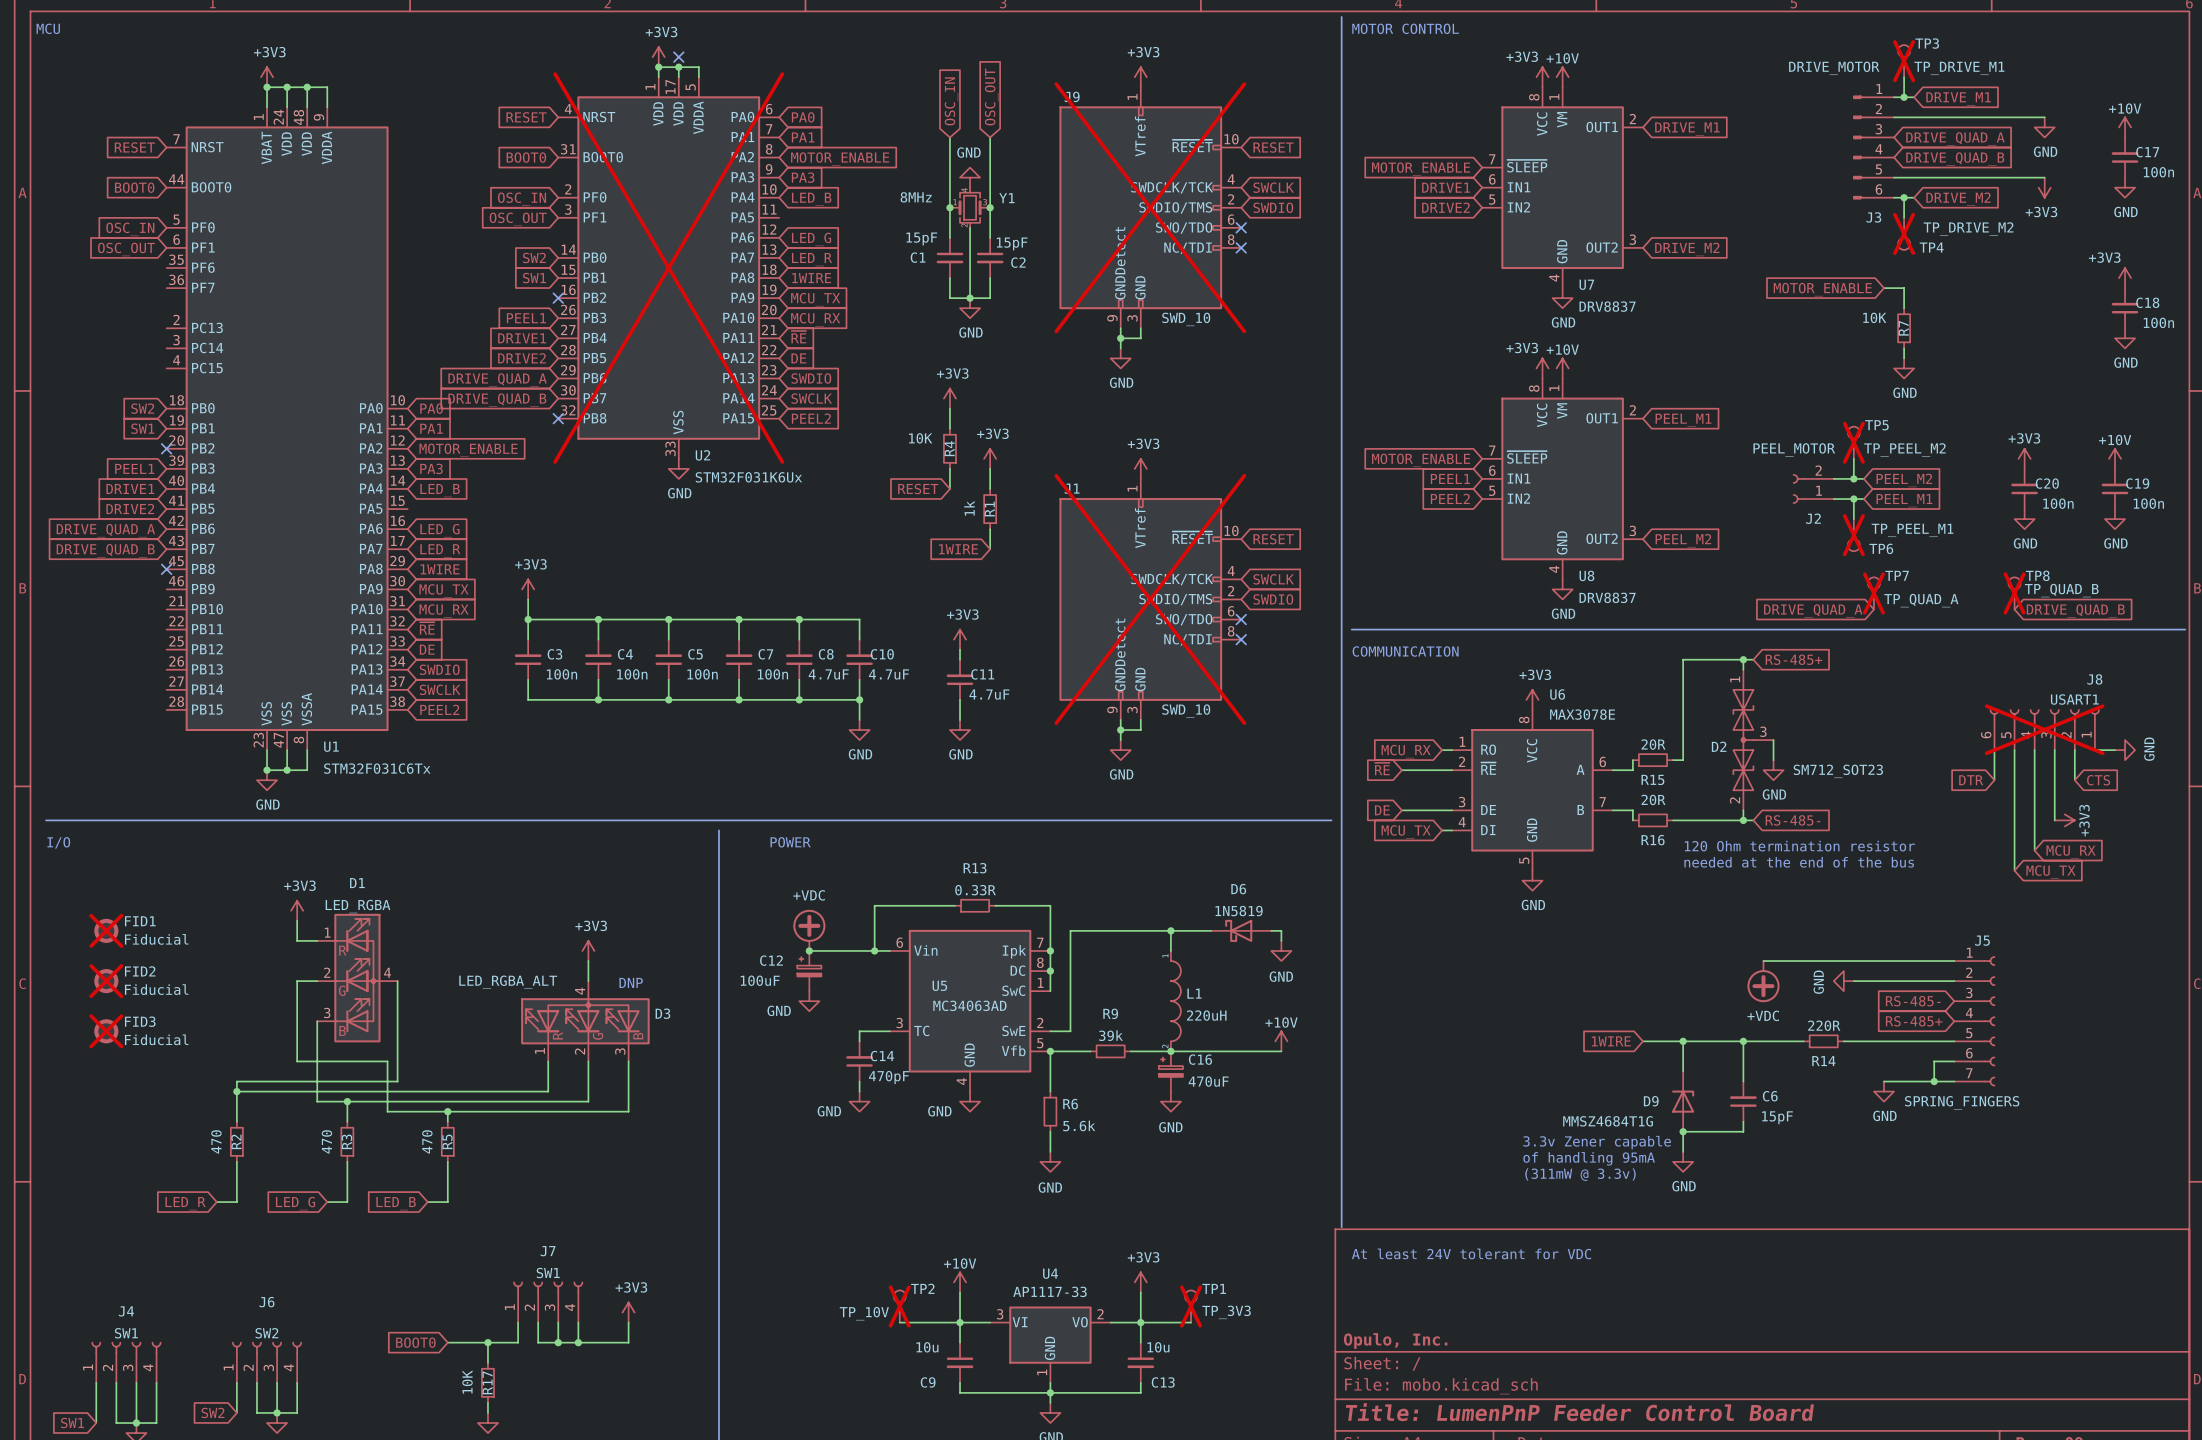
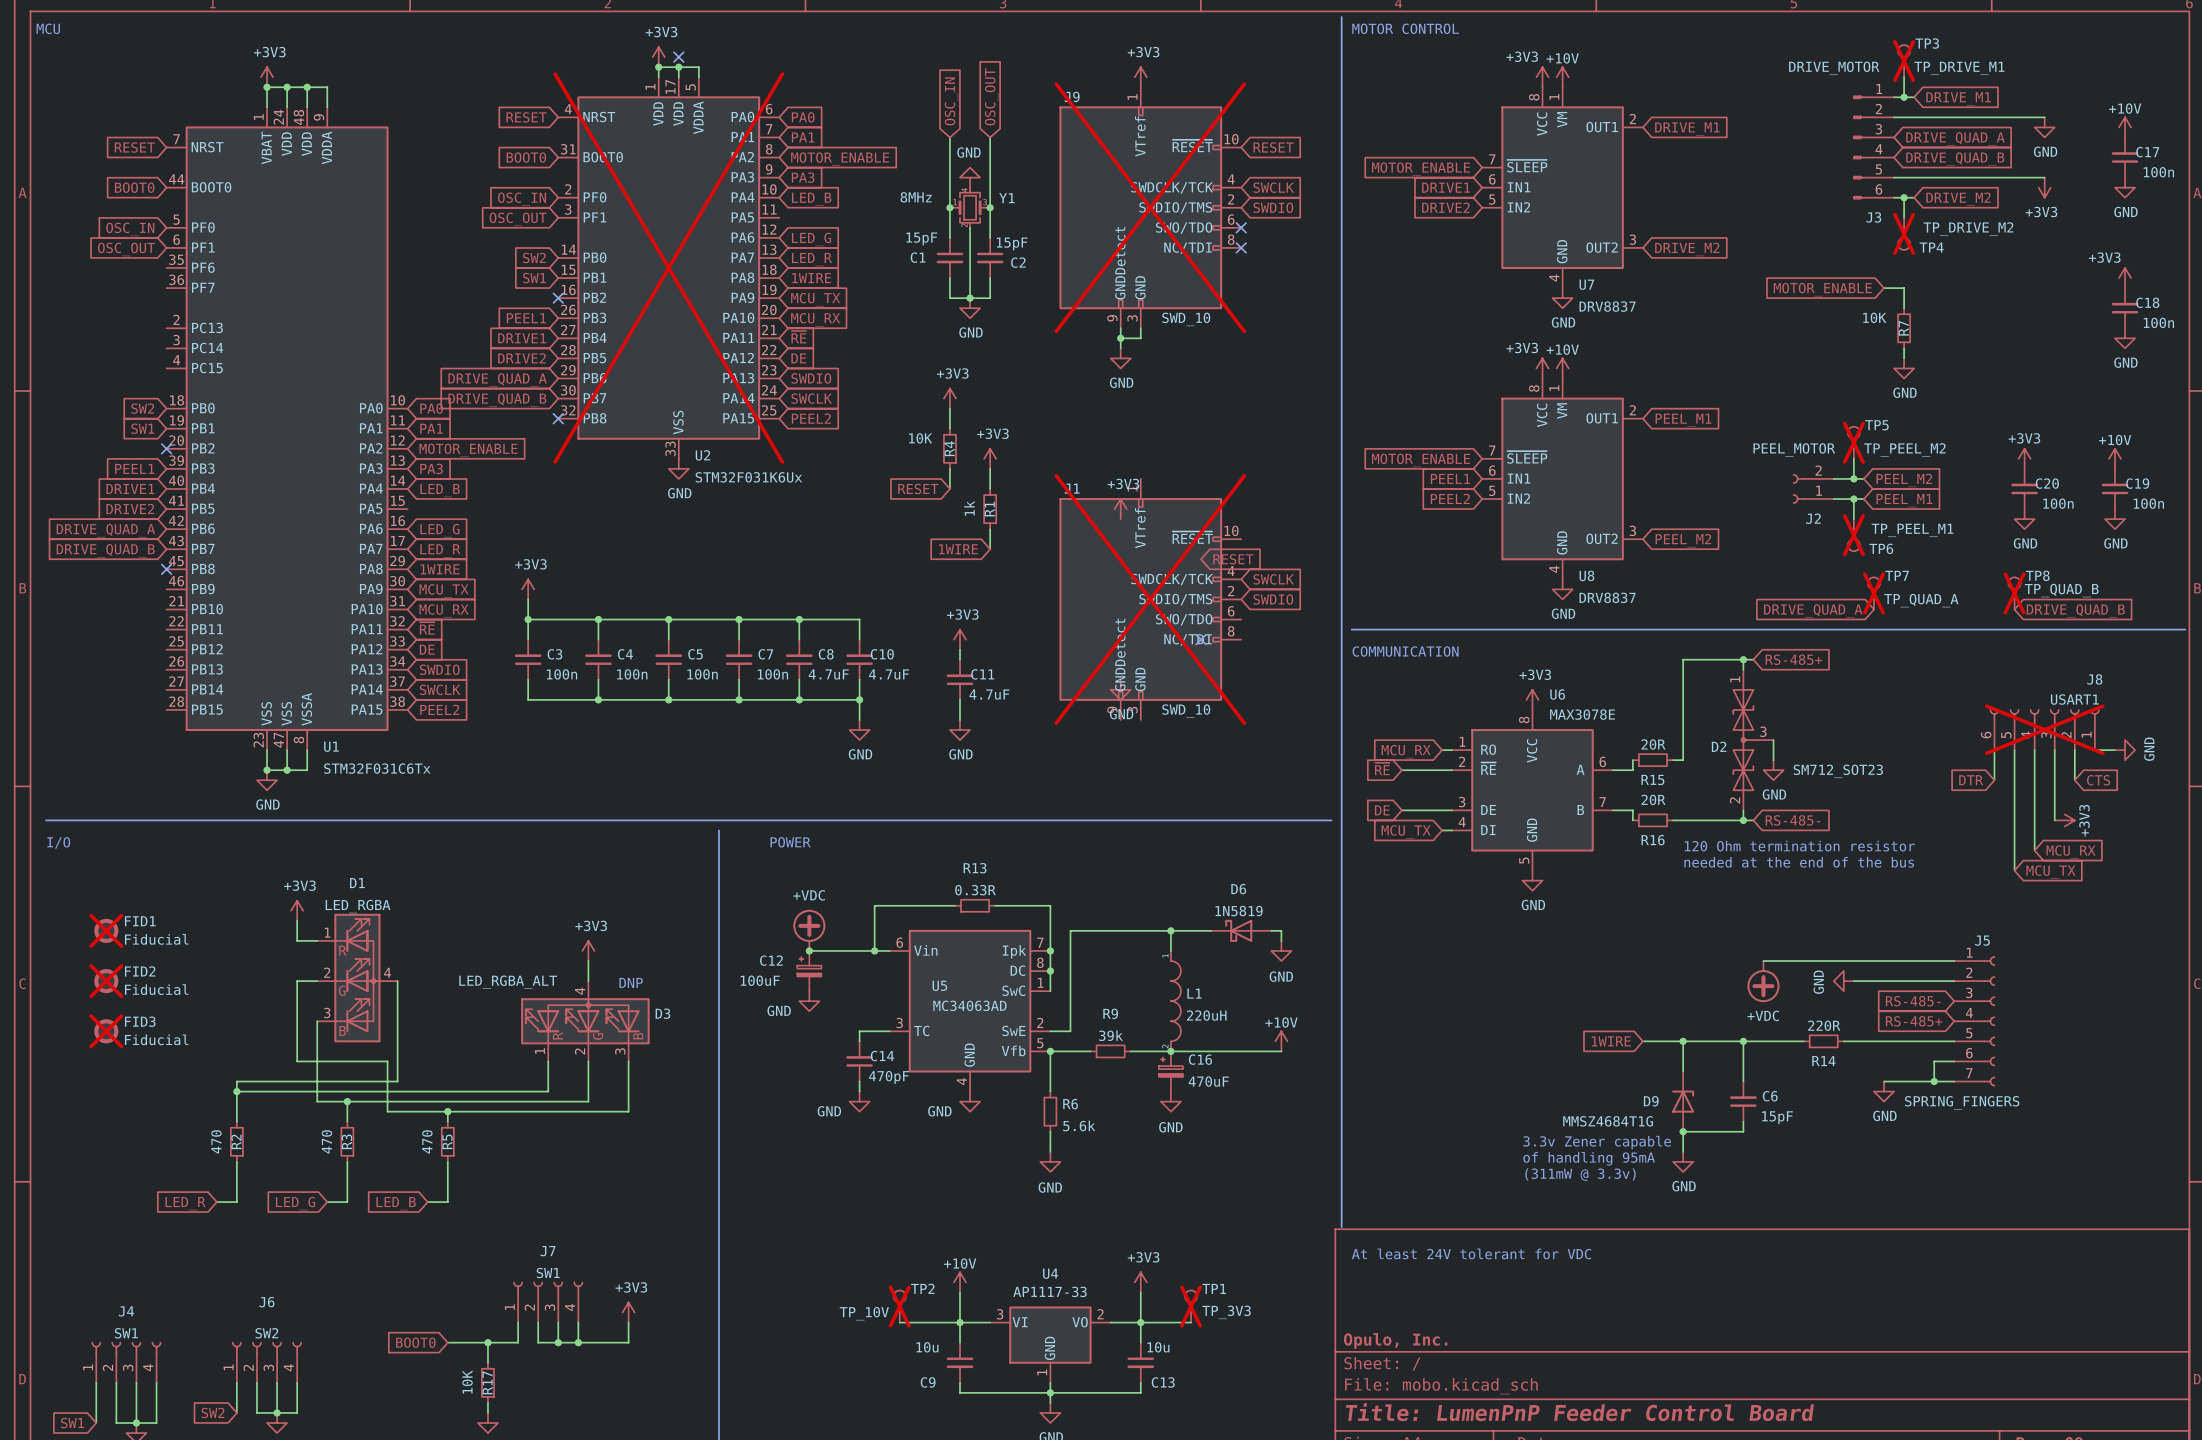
power symbol position: +3V3 (1140, 468) -> +3V3 (1120, 509)
global label position: RESET (1273, 539) -> RESET (1233, 559)
no-connect mark: (1241, 619) -> none
no-connect mark: none -> (1201, 639)
no-connect mark: (1241, 639) -> none
wire: (1120, 719) (1120, 740) -> none
wire: (1140, 719) (1140, 730) (1120, 730) -> none
junction: (1120, 730) -> none
power symbol position: GND (1120, 750) -> GND (1120, 689)

